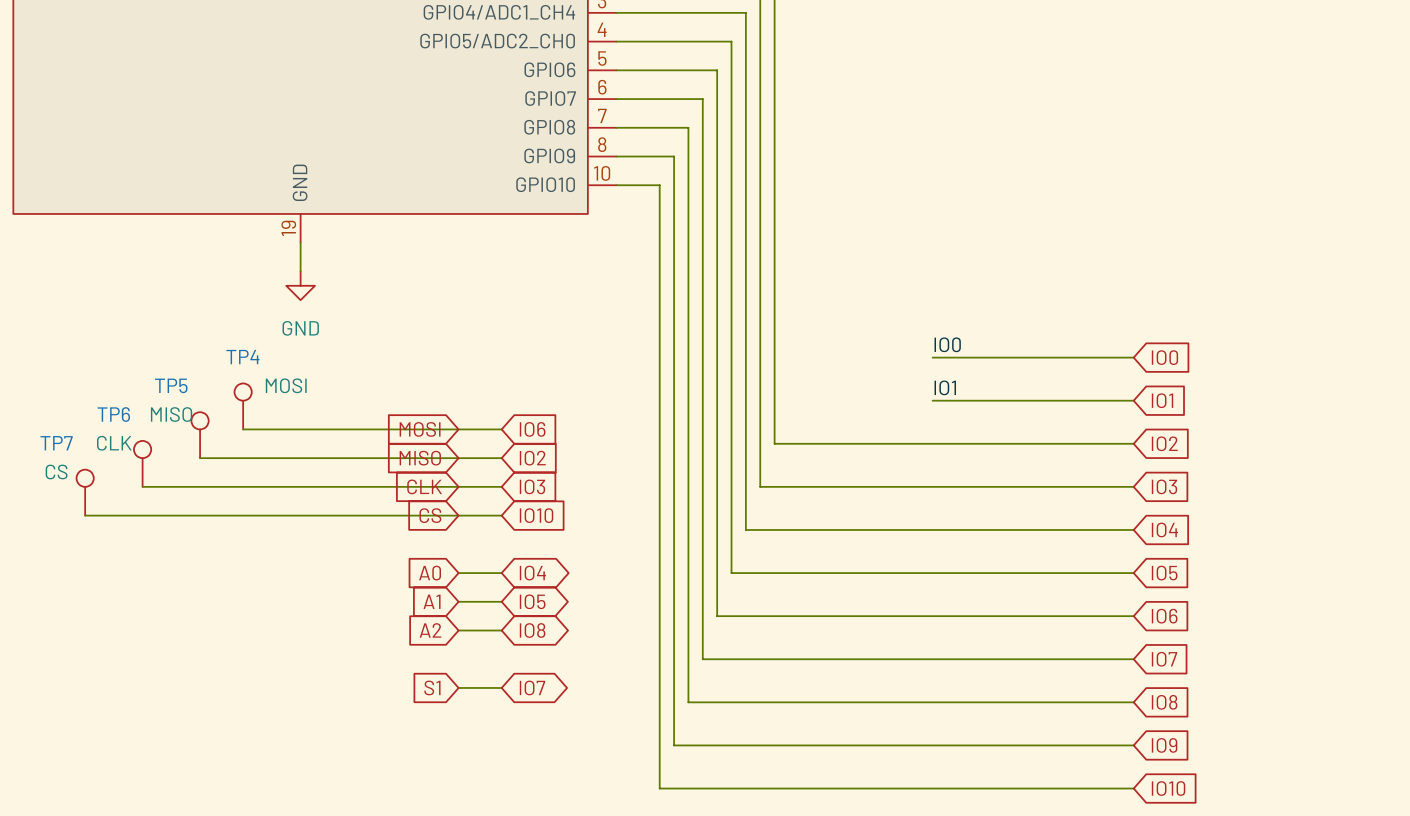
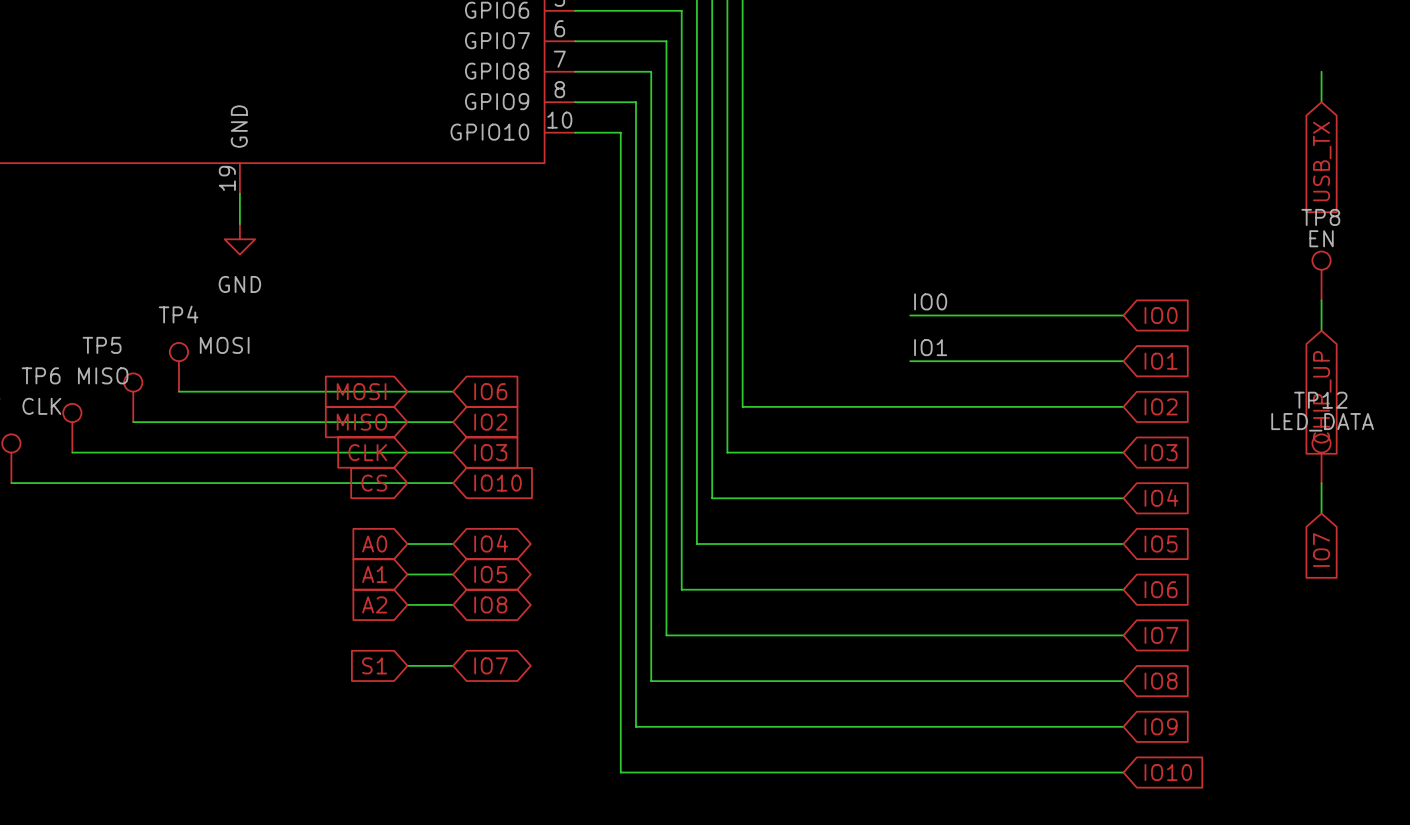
wire: none -> (1321, 71) (1321, 102)
global label: none -> USB_TX (1322, 161)
TP8: none -> EN (1321, 275)
wire: none -> (1321, 300) (1321, 330)
global label: none -> CHIP_UP (1322, 397)
TP12: none -> LED_DATA (1321, 458)
wire: none -> (1321, 483) (1321, 513)
global label: none -> IO7 (1321, 550)

